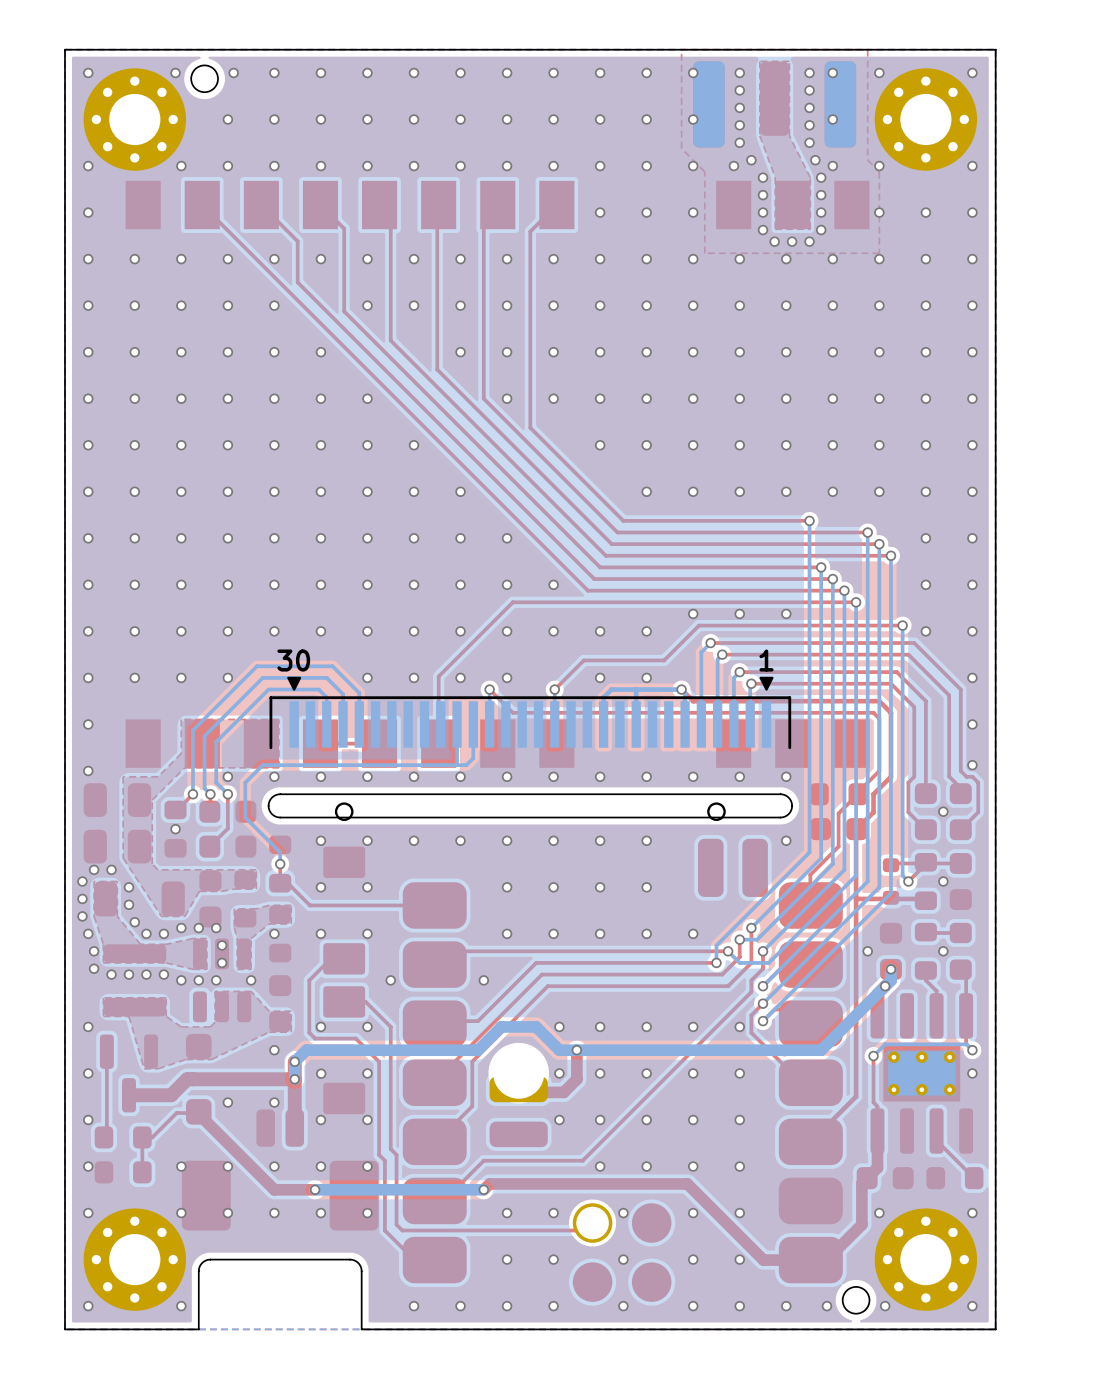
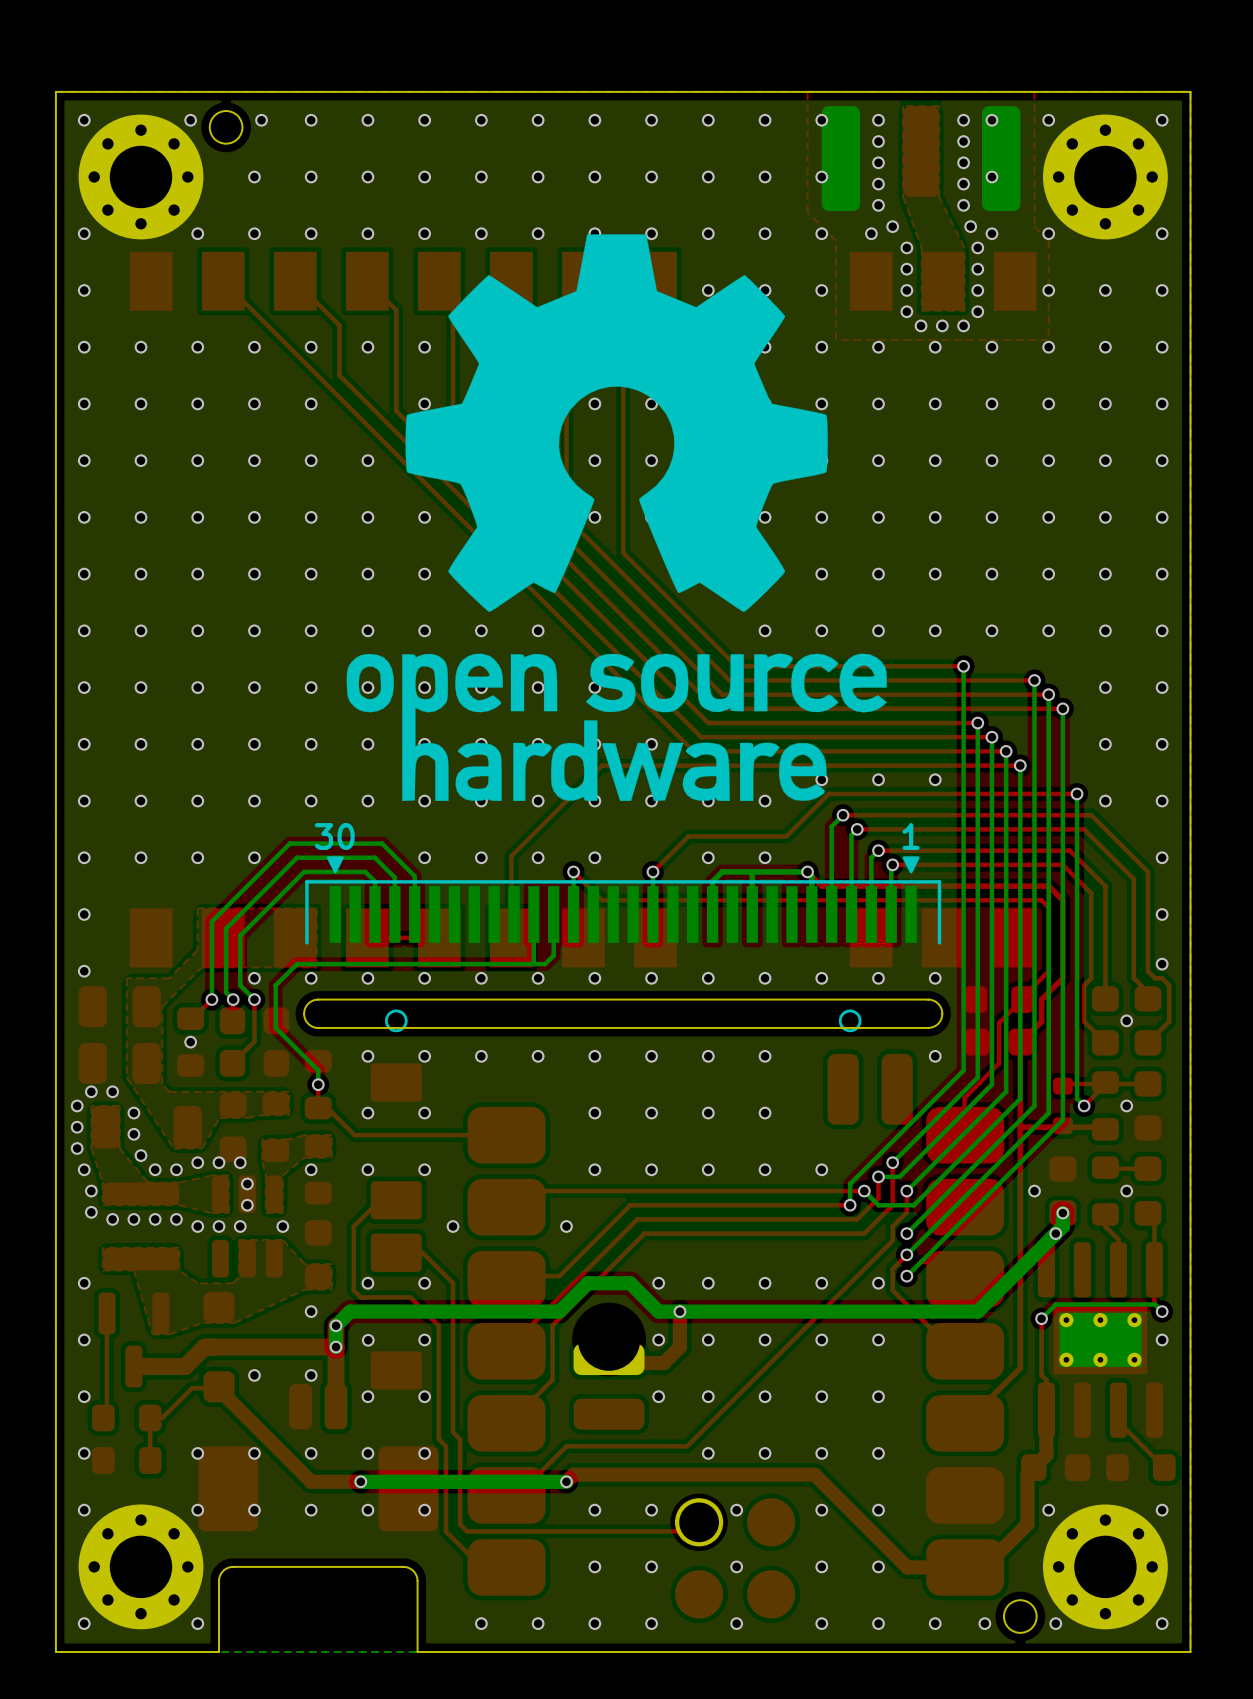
drawing: none -> [346, 234, 887, 802]

